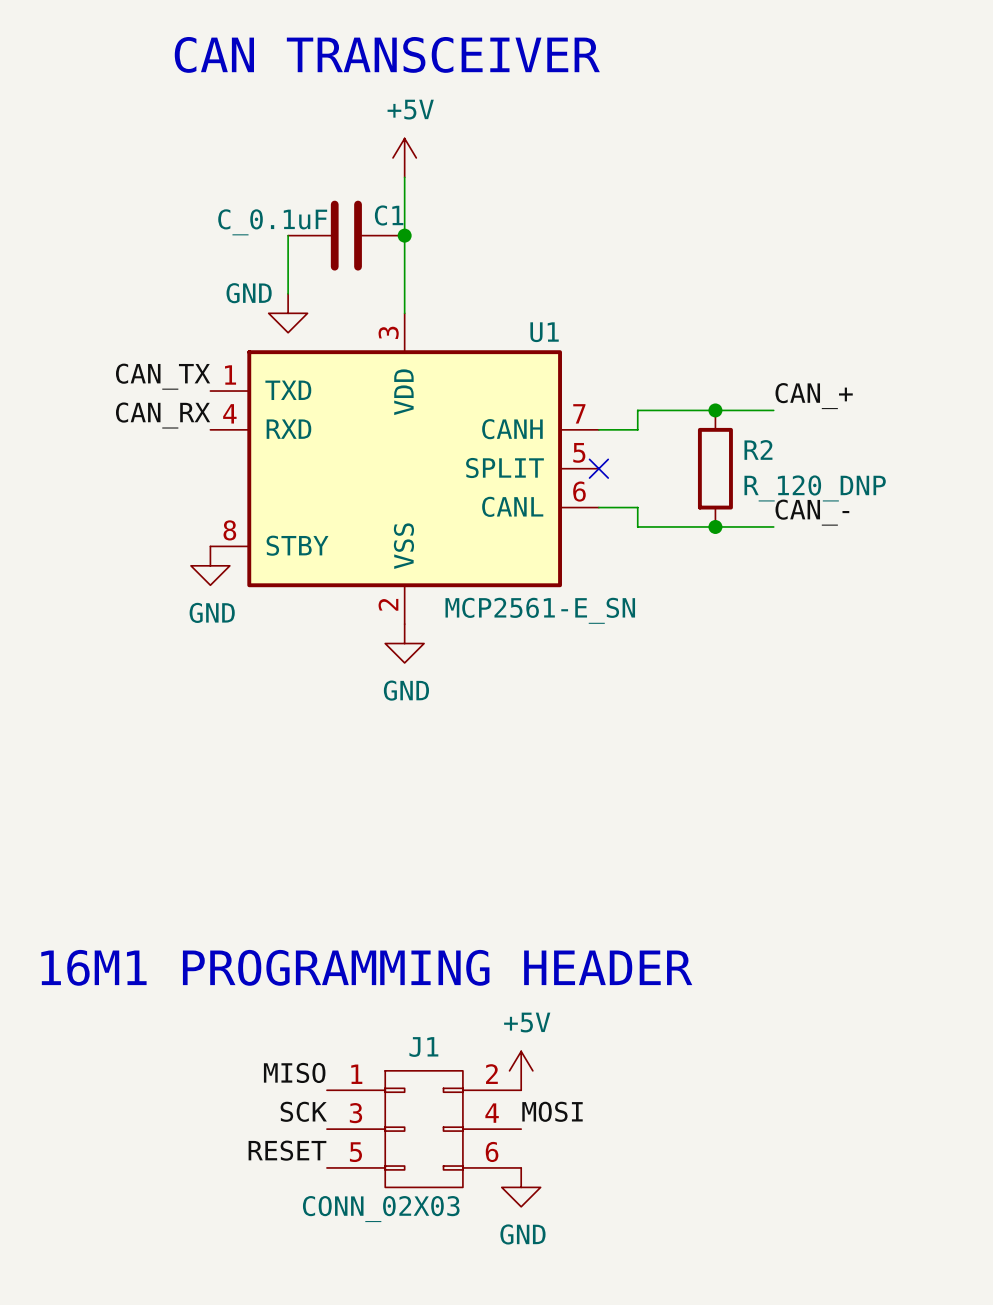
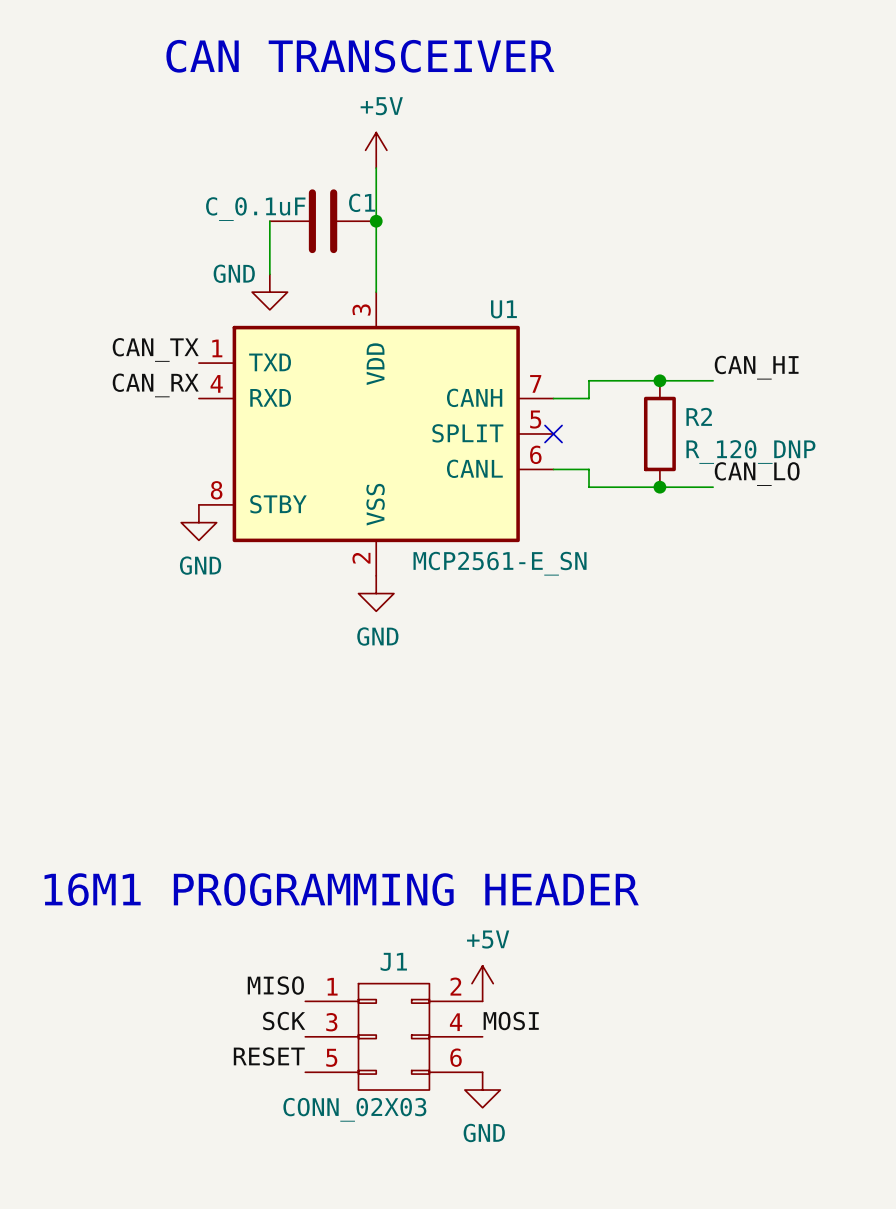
label: CAN_+ (814, 396) -> CAN_HI (756, 367)
label: CAN_- (812, 512) -> CAN_LO (757, 474)

